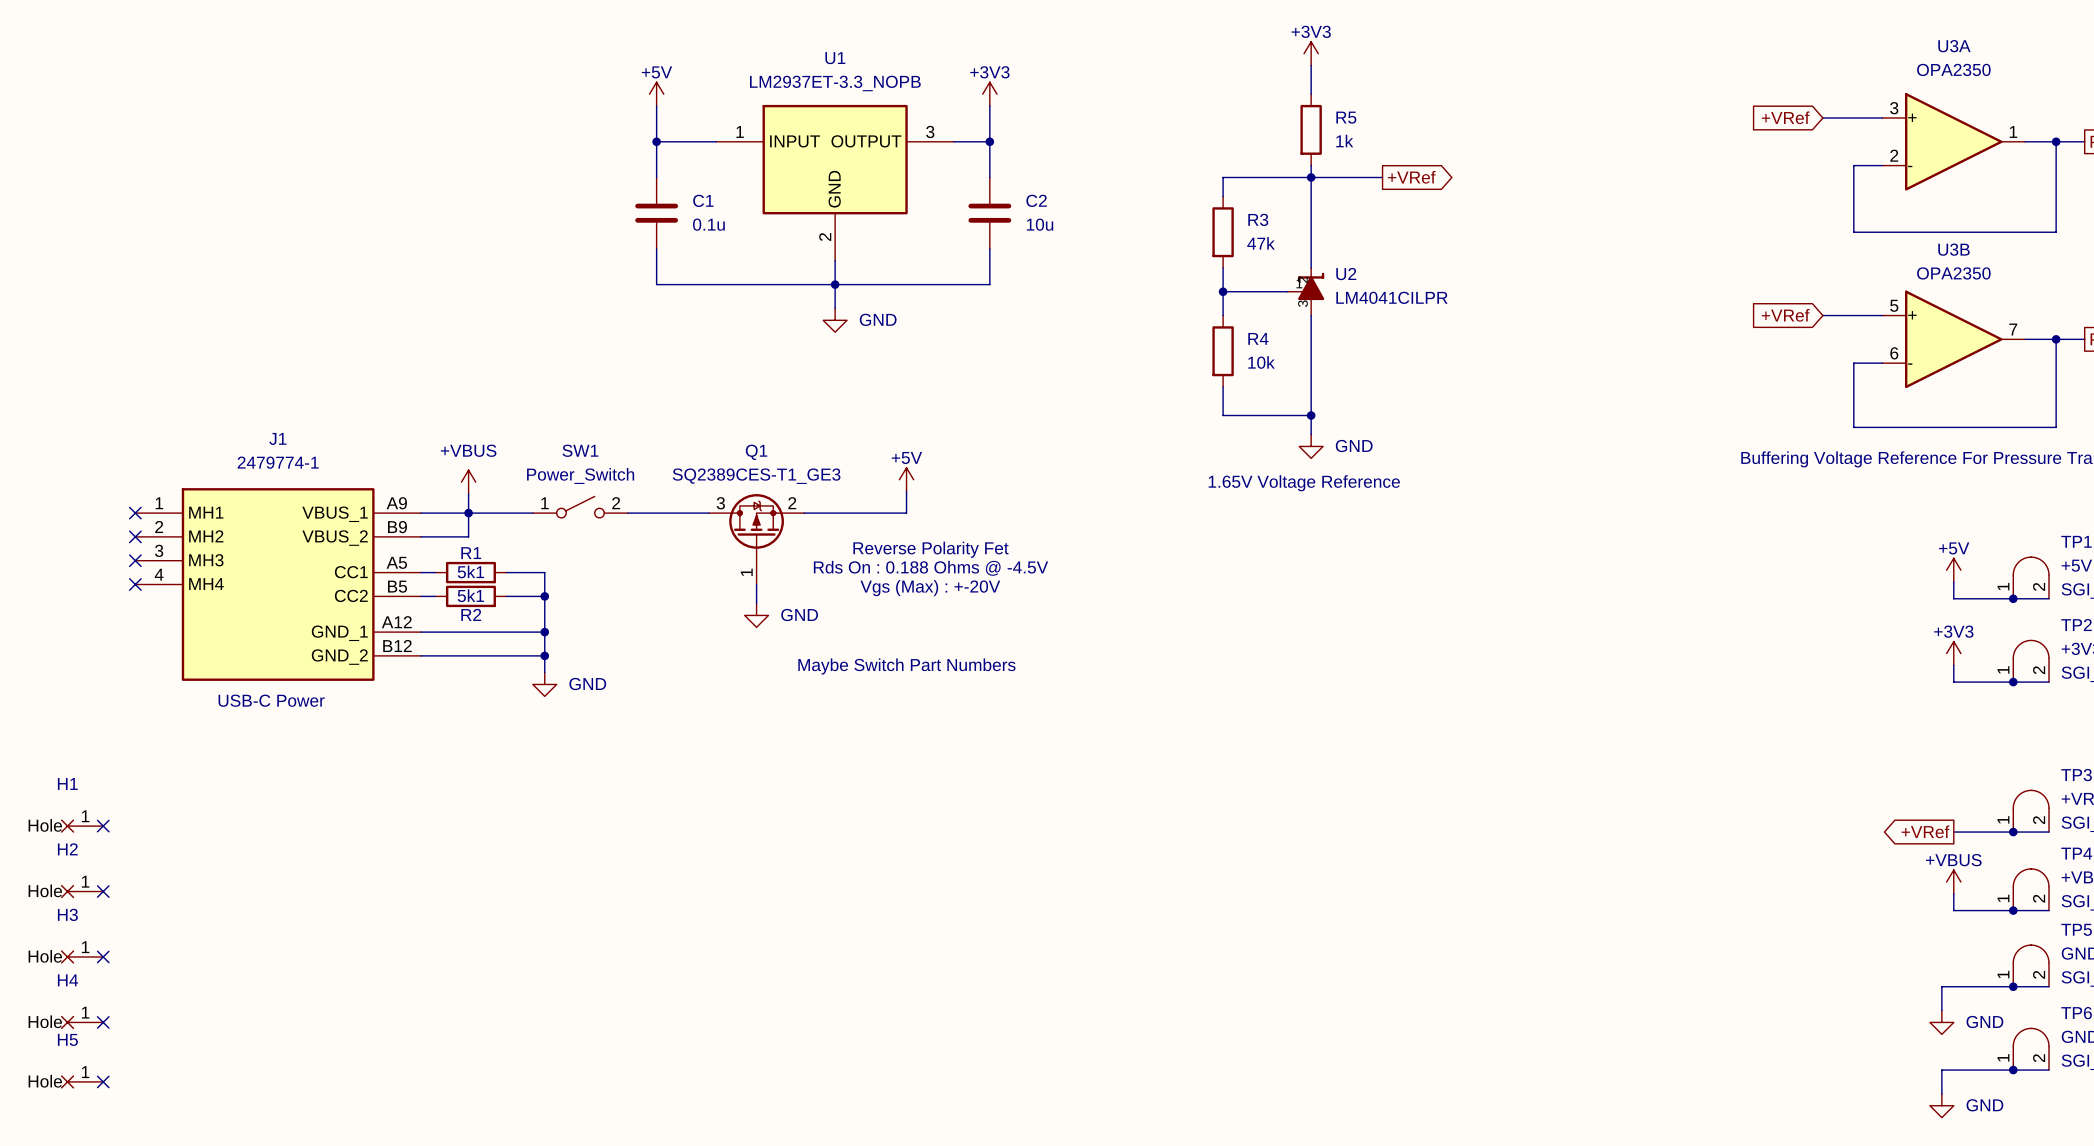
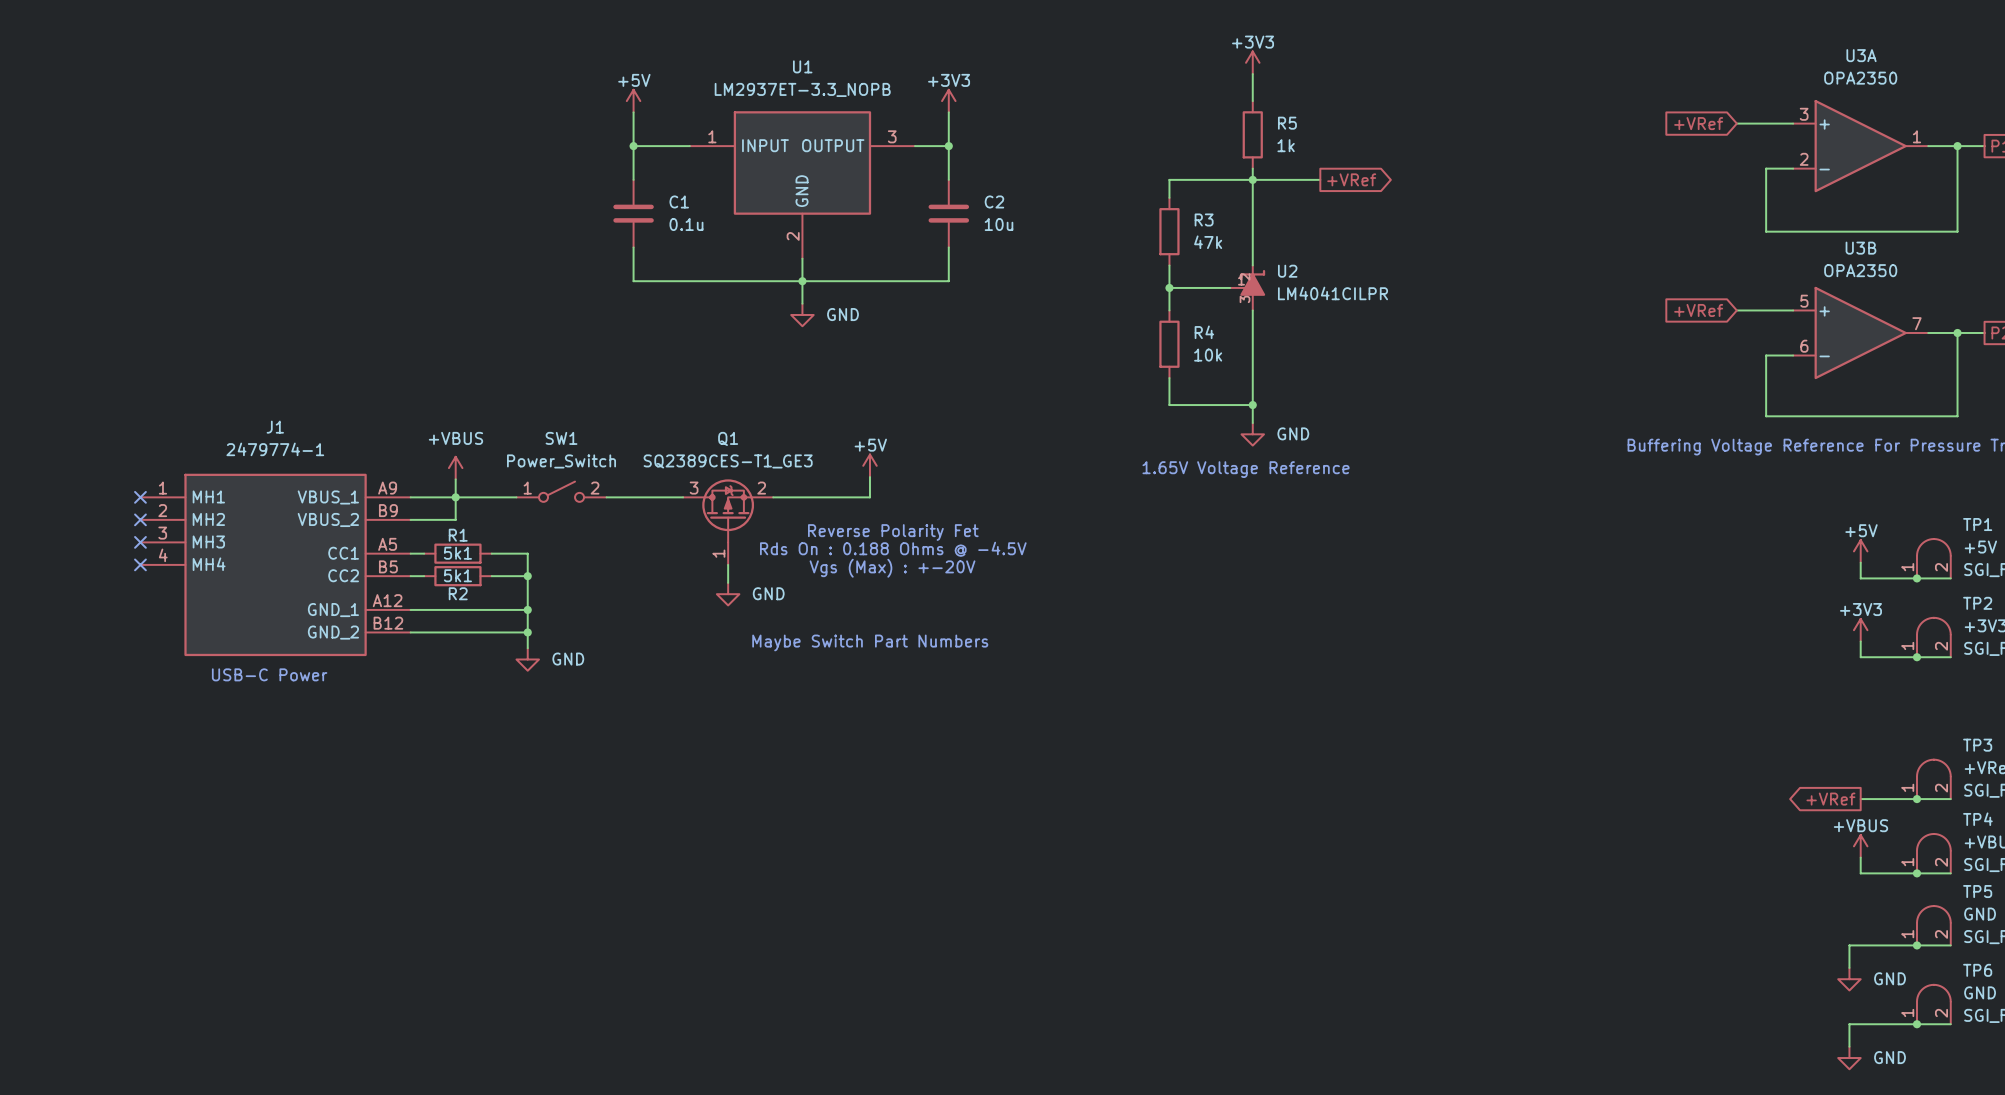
H1: (82, 826) -> none
no-connect mark: (103, 826) -> none
H2: (82, 891) -> none
no-connect mark: (103, 891) -> none
H3: (82, 956) -> none
no-connect mark: (103, 956) -> none
H4: (82, 1022) -> none
no-connect mark: (103, 1022) -> none
H5: (82, 1081) -> none
no-connect mark: (103, 1081) -> none

